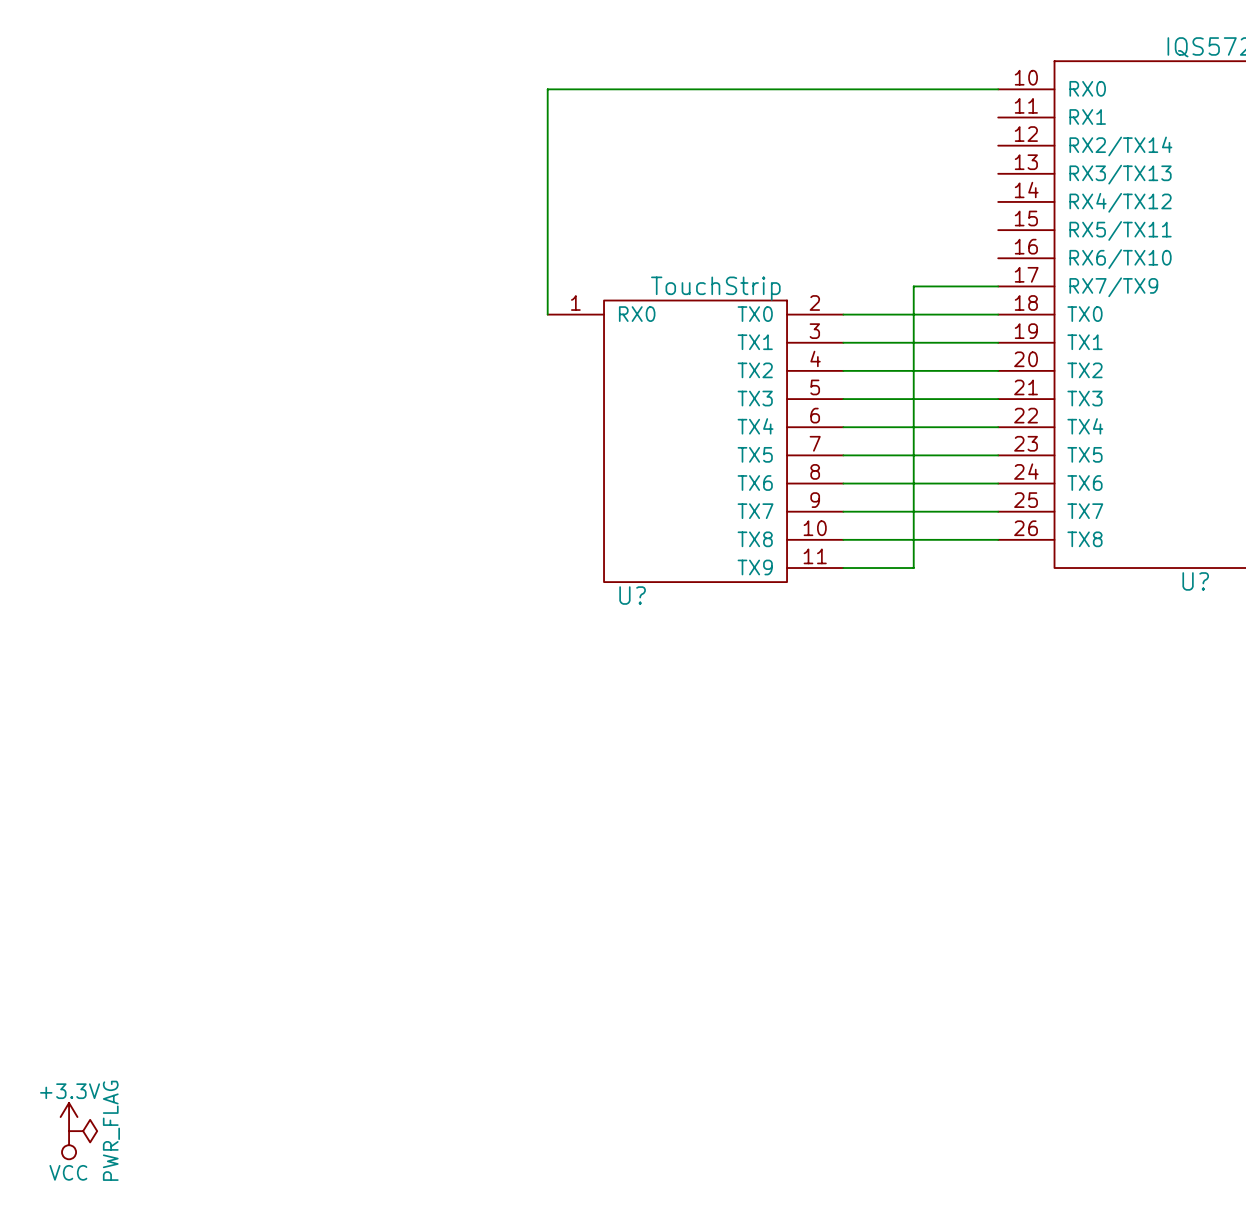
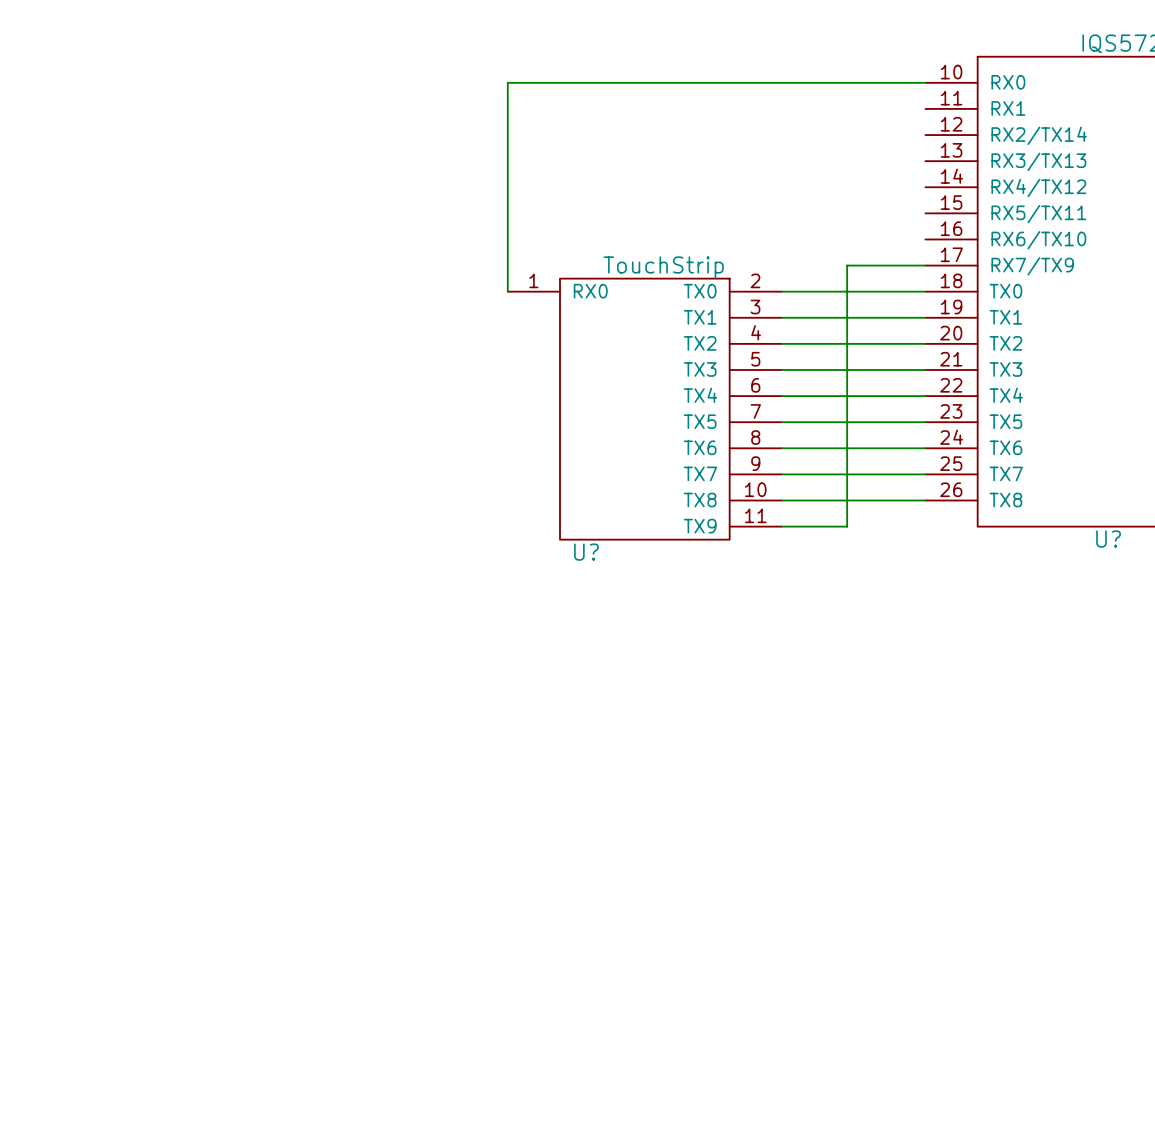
power symbol: +3.3V (69, 1117) -> none
power symbol: PWR_FLAG (83, 1131) -> none
power symbol: VCC (69, 1145) -> none

